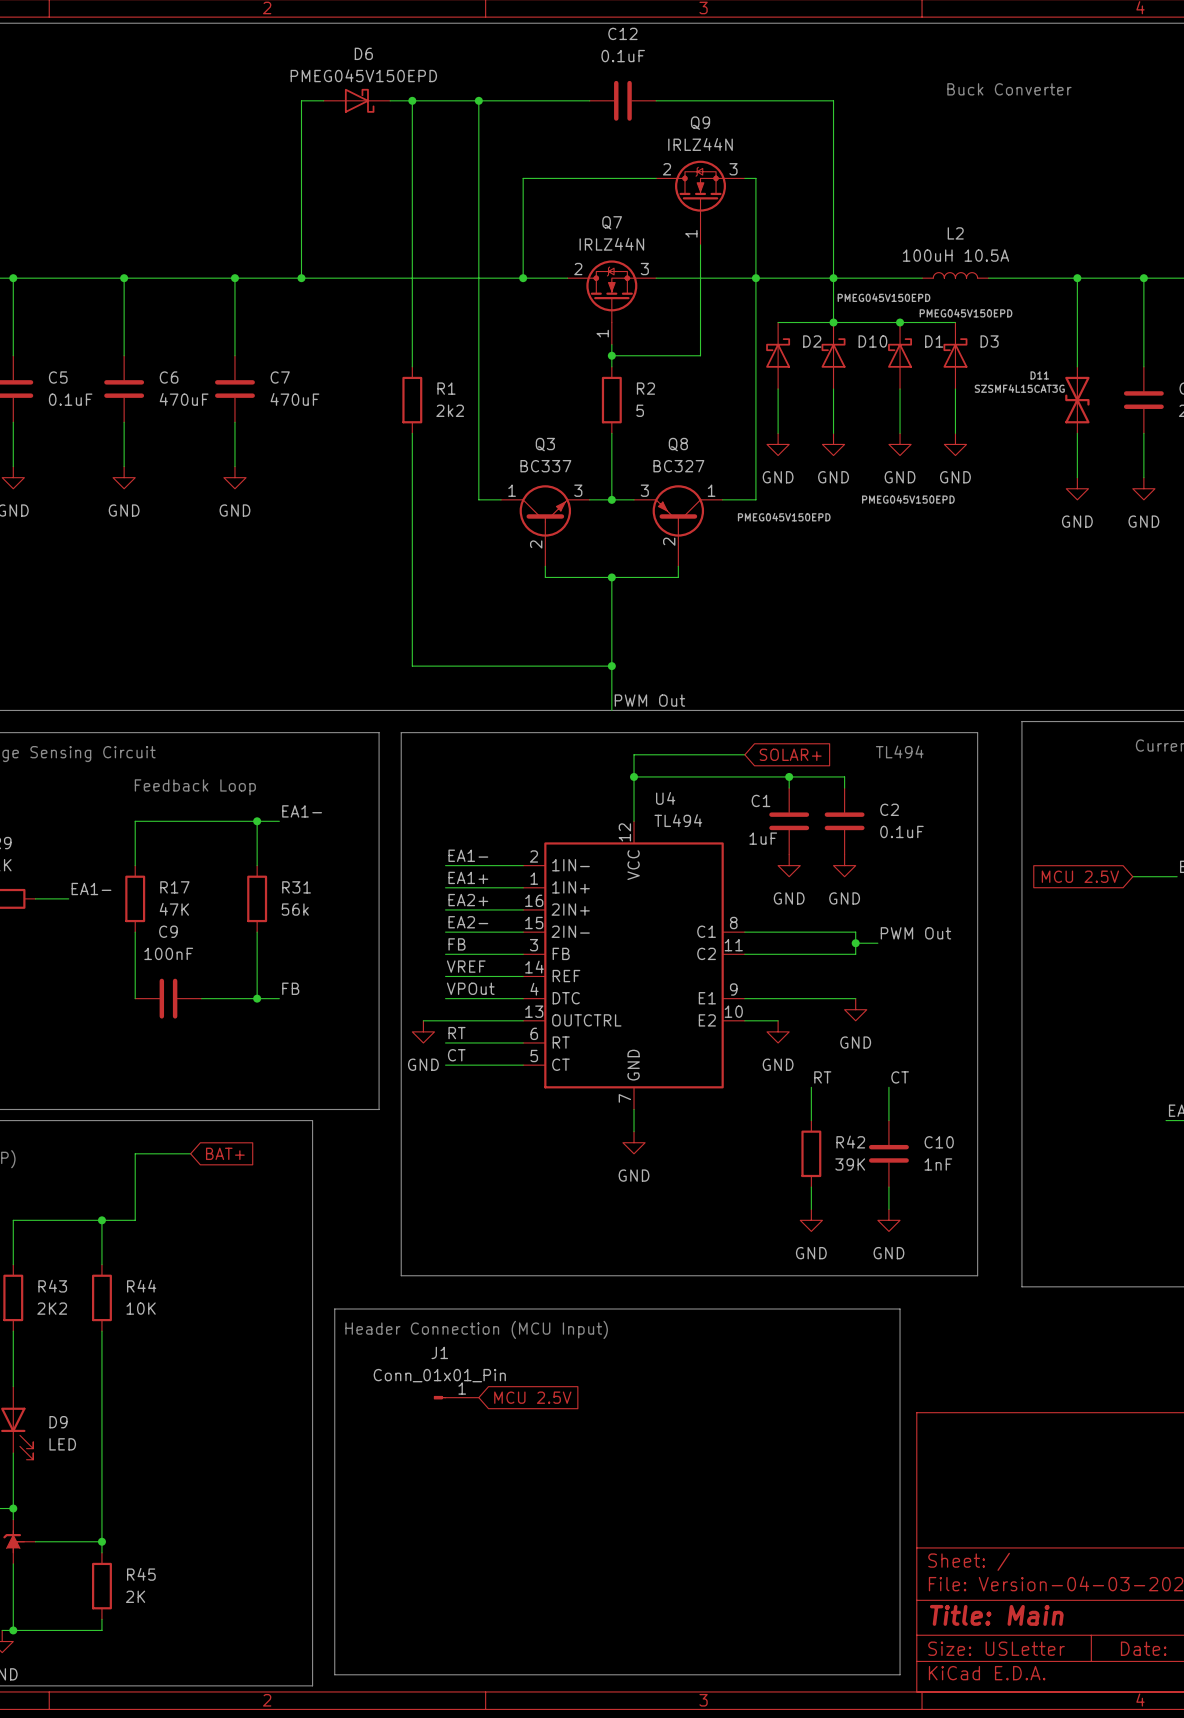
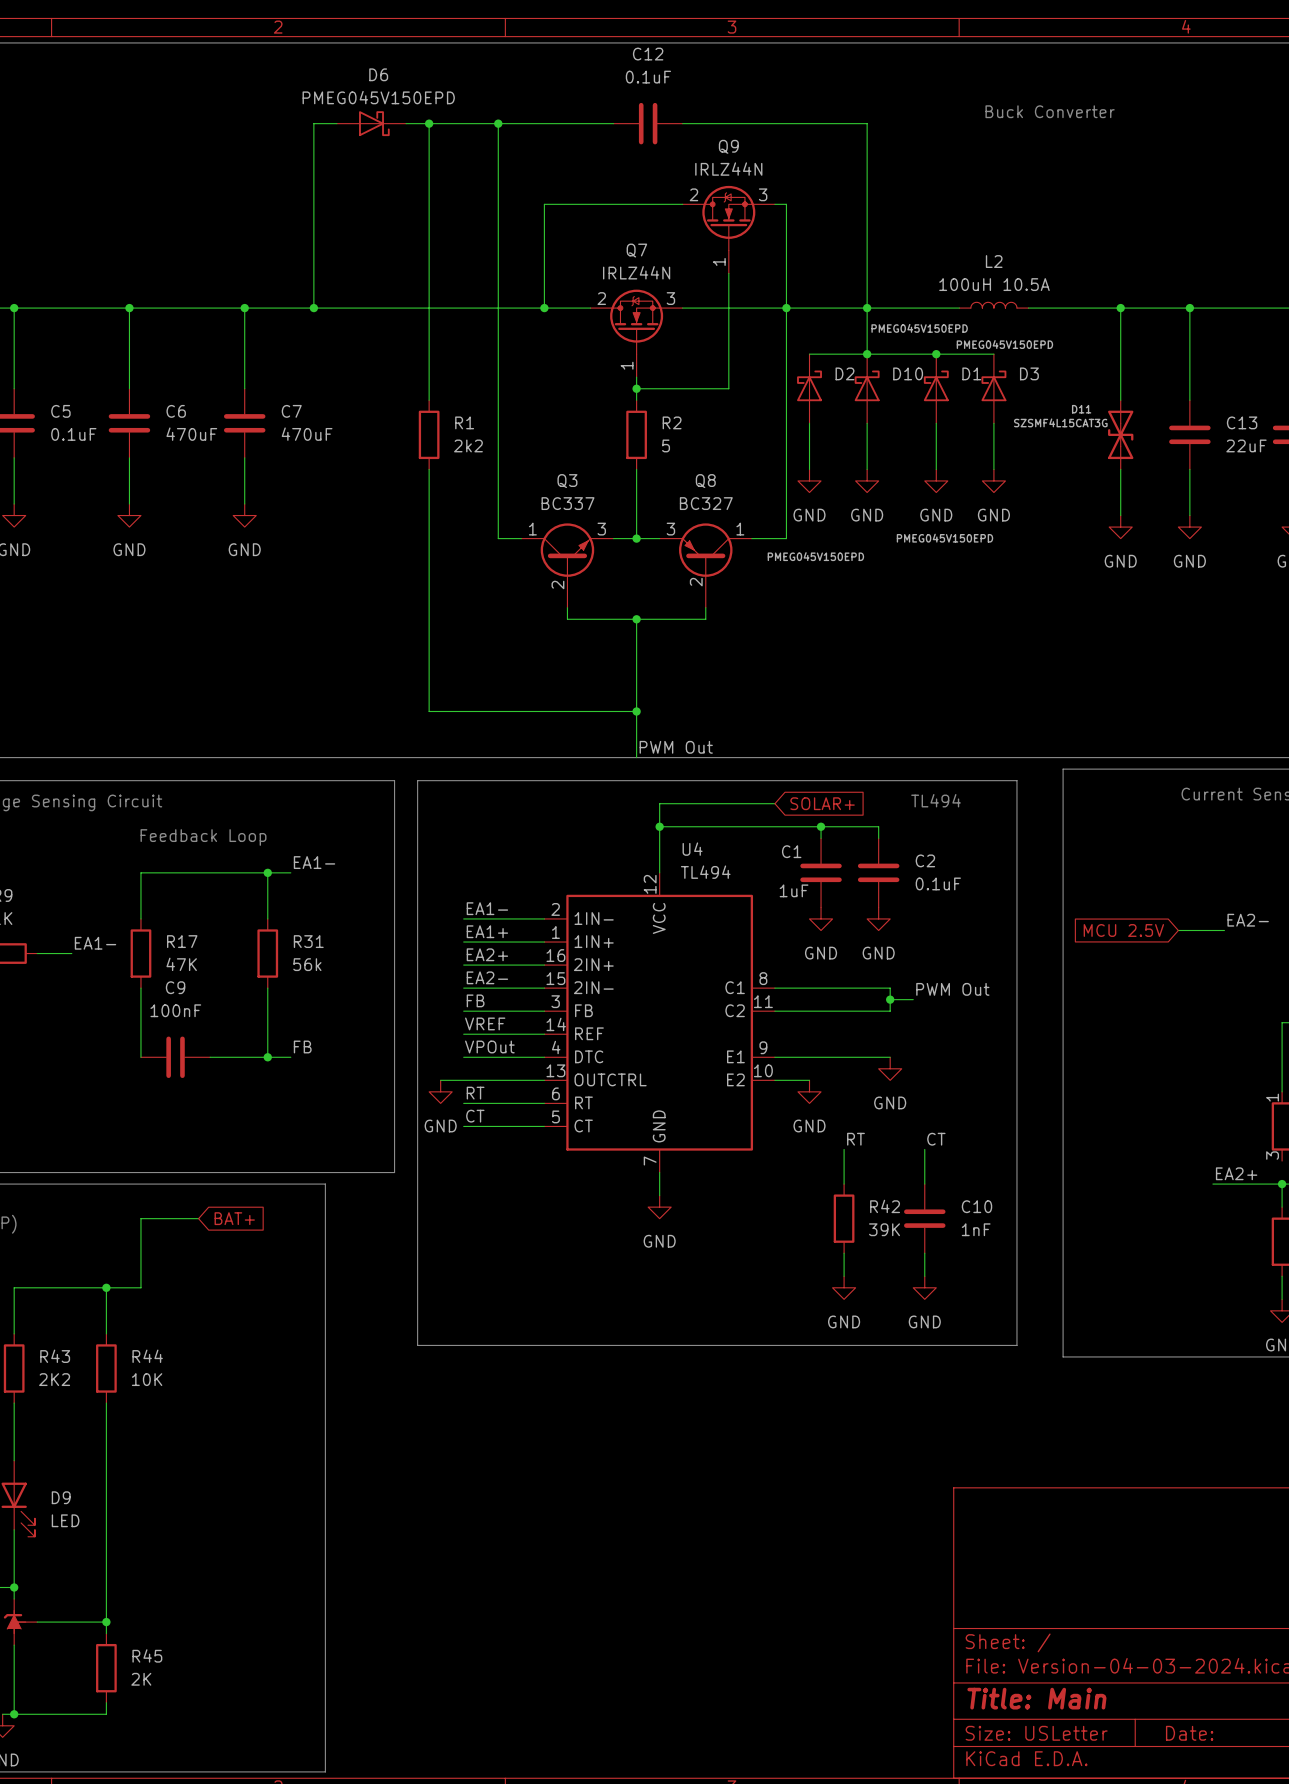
line: (334, 1309) (900, 1309) (900, 1674) (334, 1674) (334, 1309) -> none
text: Header Connection (MCU Input) (476, 1329) -> none
J1: Conn_01x01_Pin (456, 1397) -> none
global label: MCU 2.5V (532, 1397) -> none

